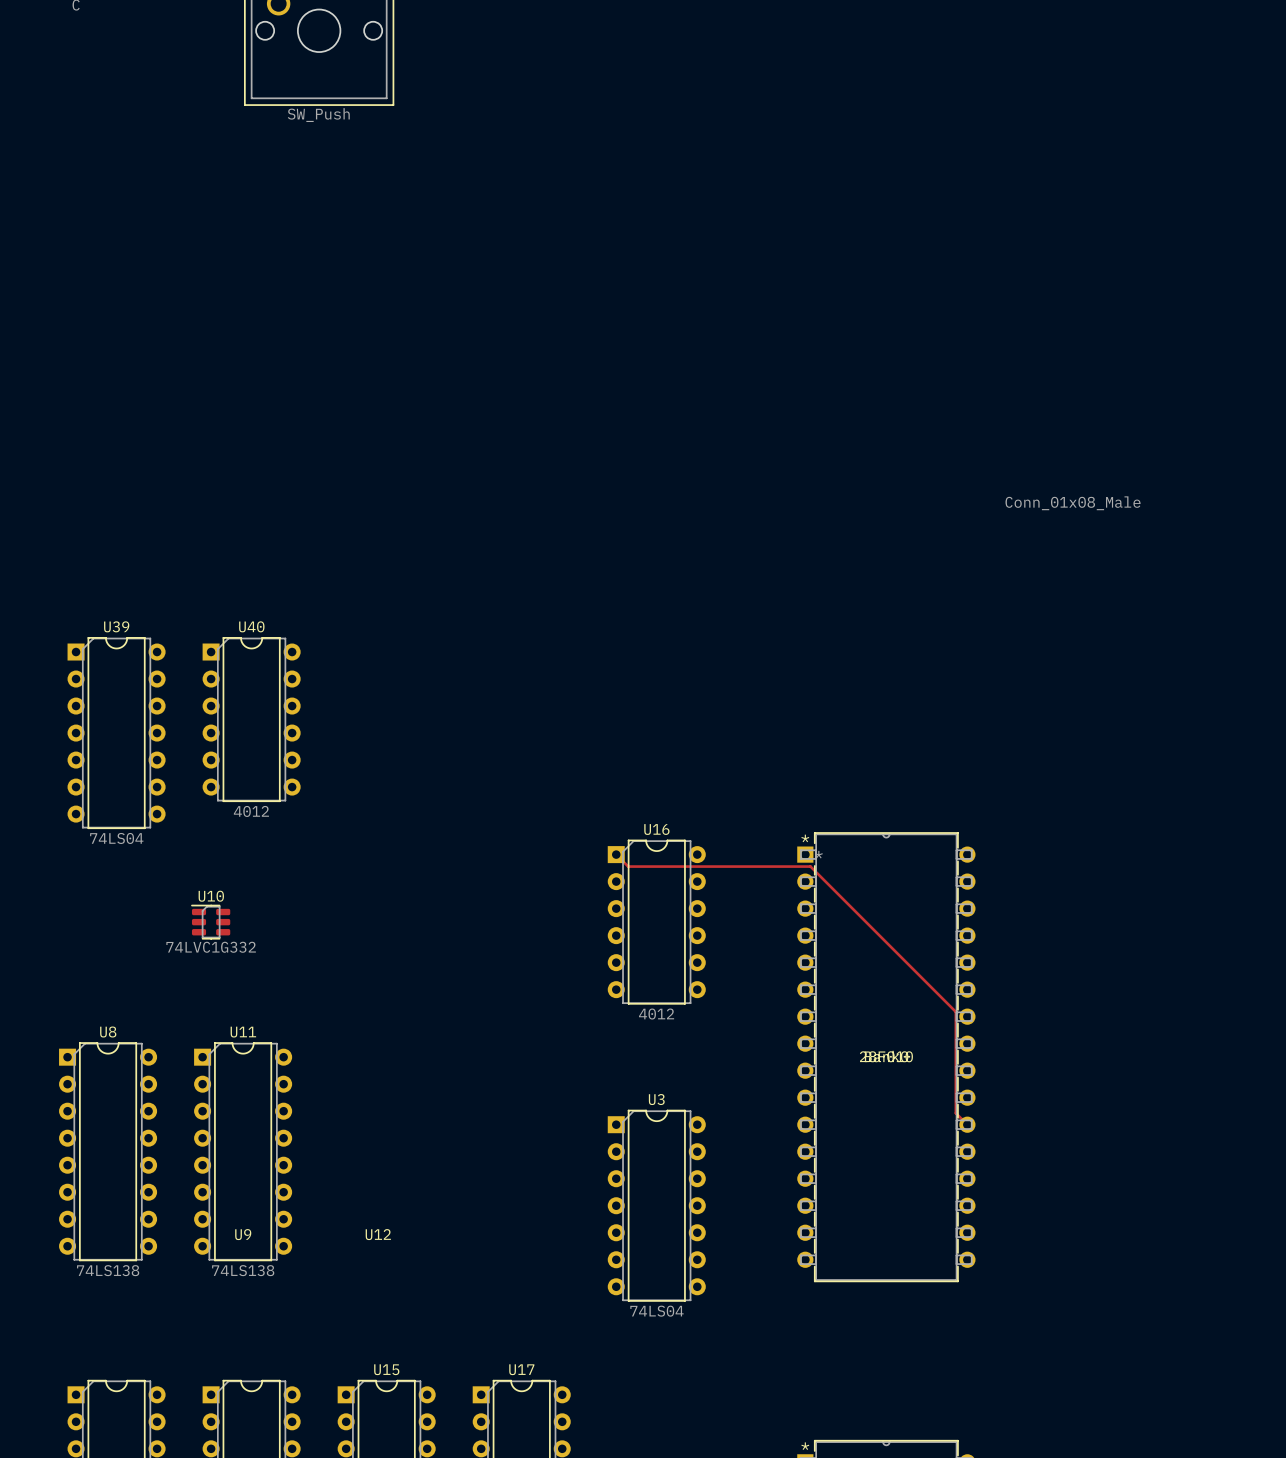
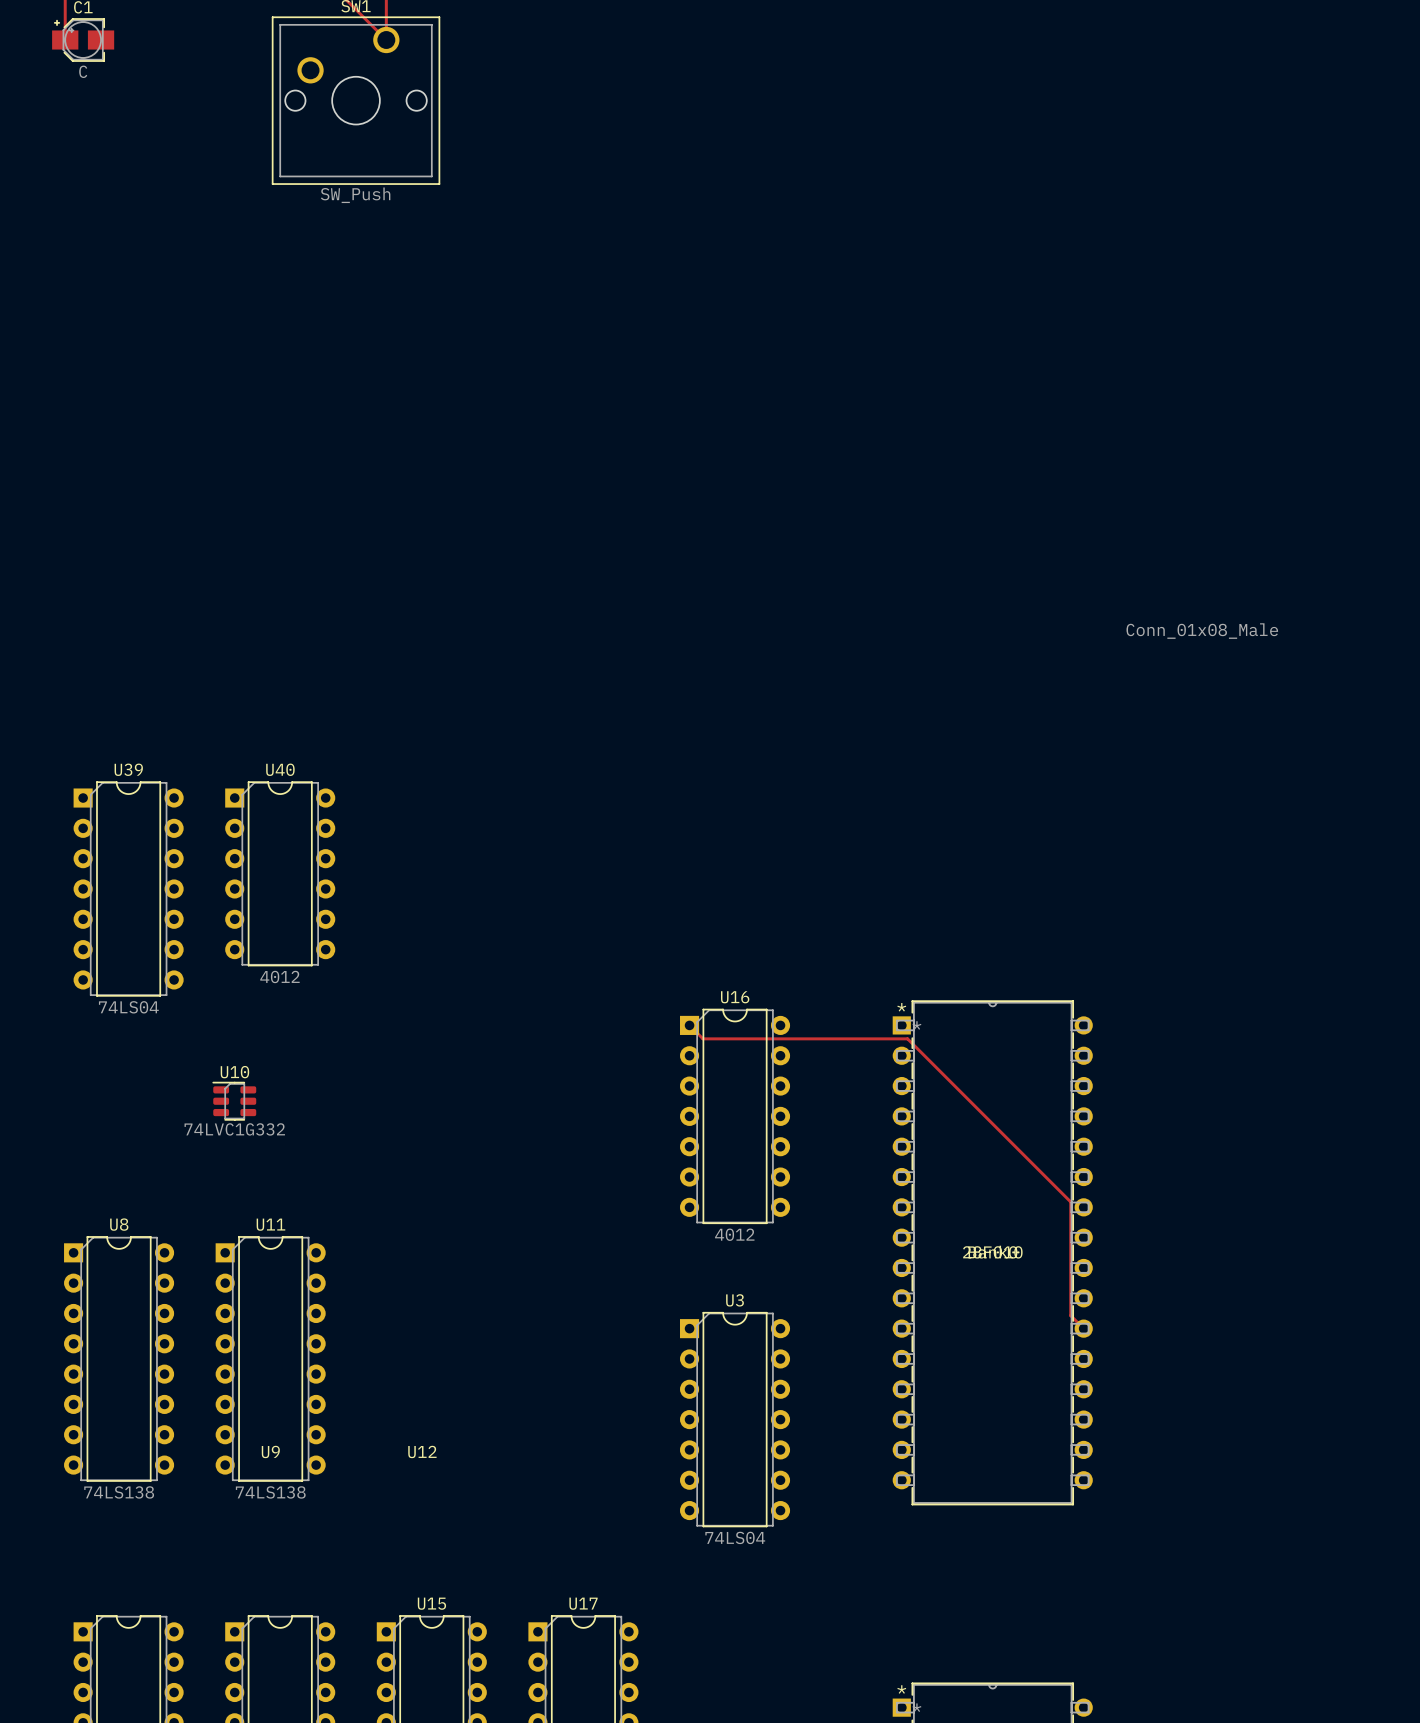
U16 footprint: [607, 839, 706, 1005] -> [680, 1008, 791, 1224]

